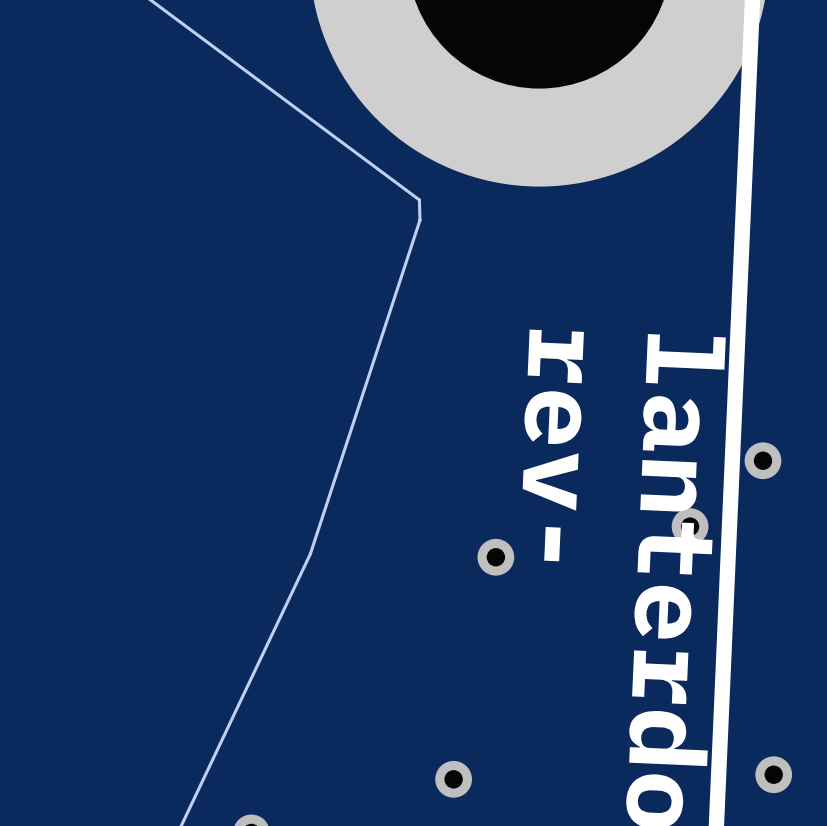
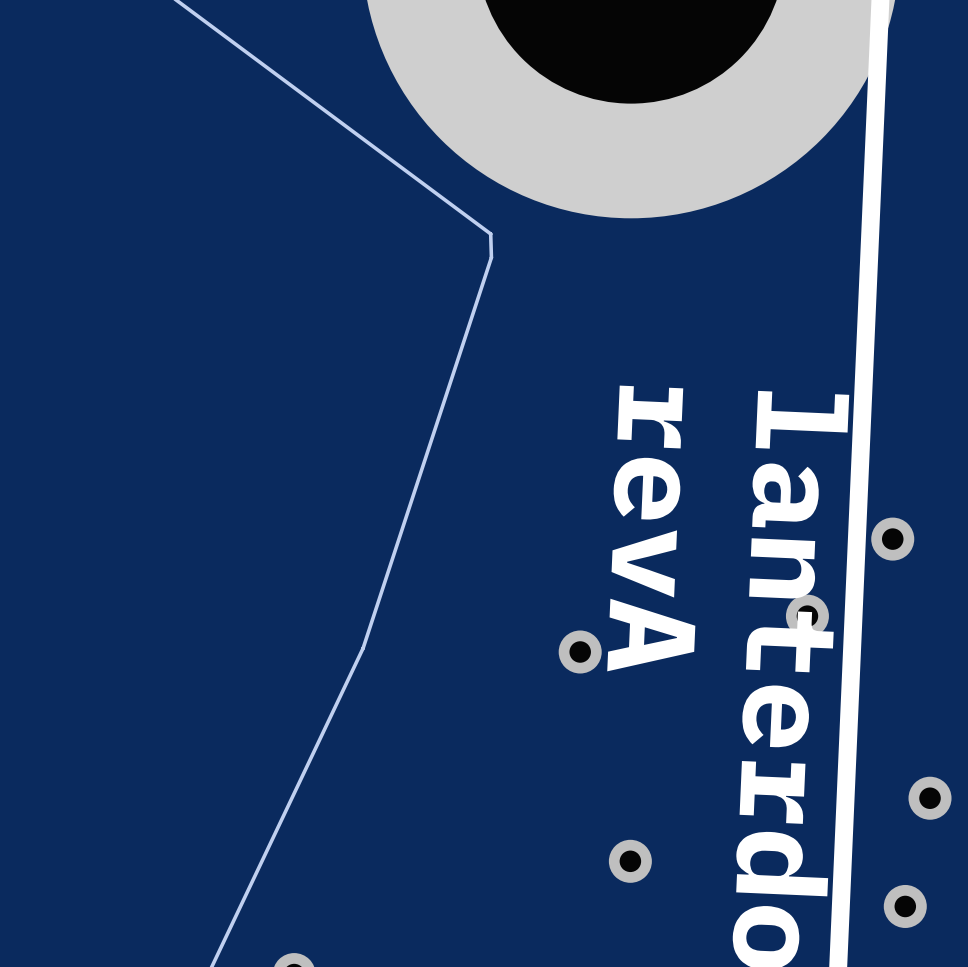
text: rev- (553, 445) -> revA (651, 528)
via: none -> (930, 798)
via position: (453, 779) -> (630, 861)

